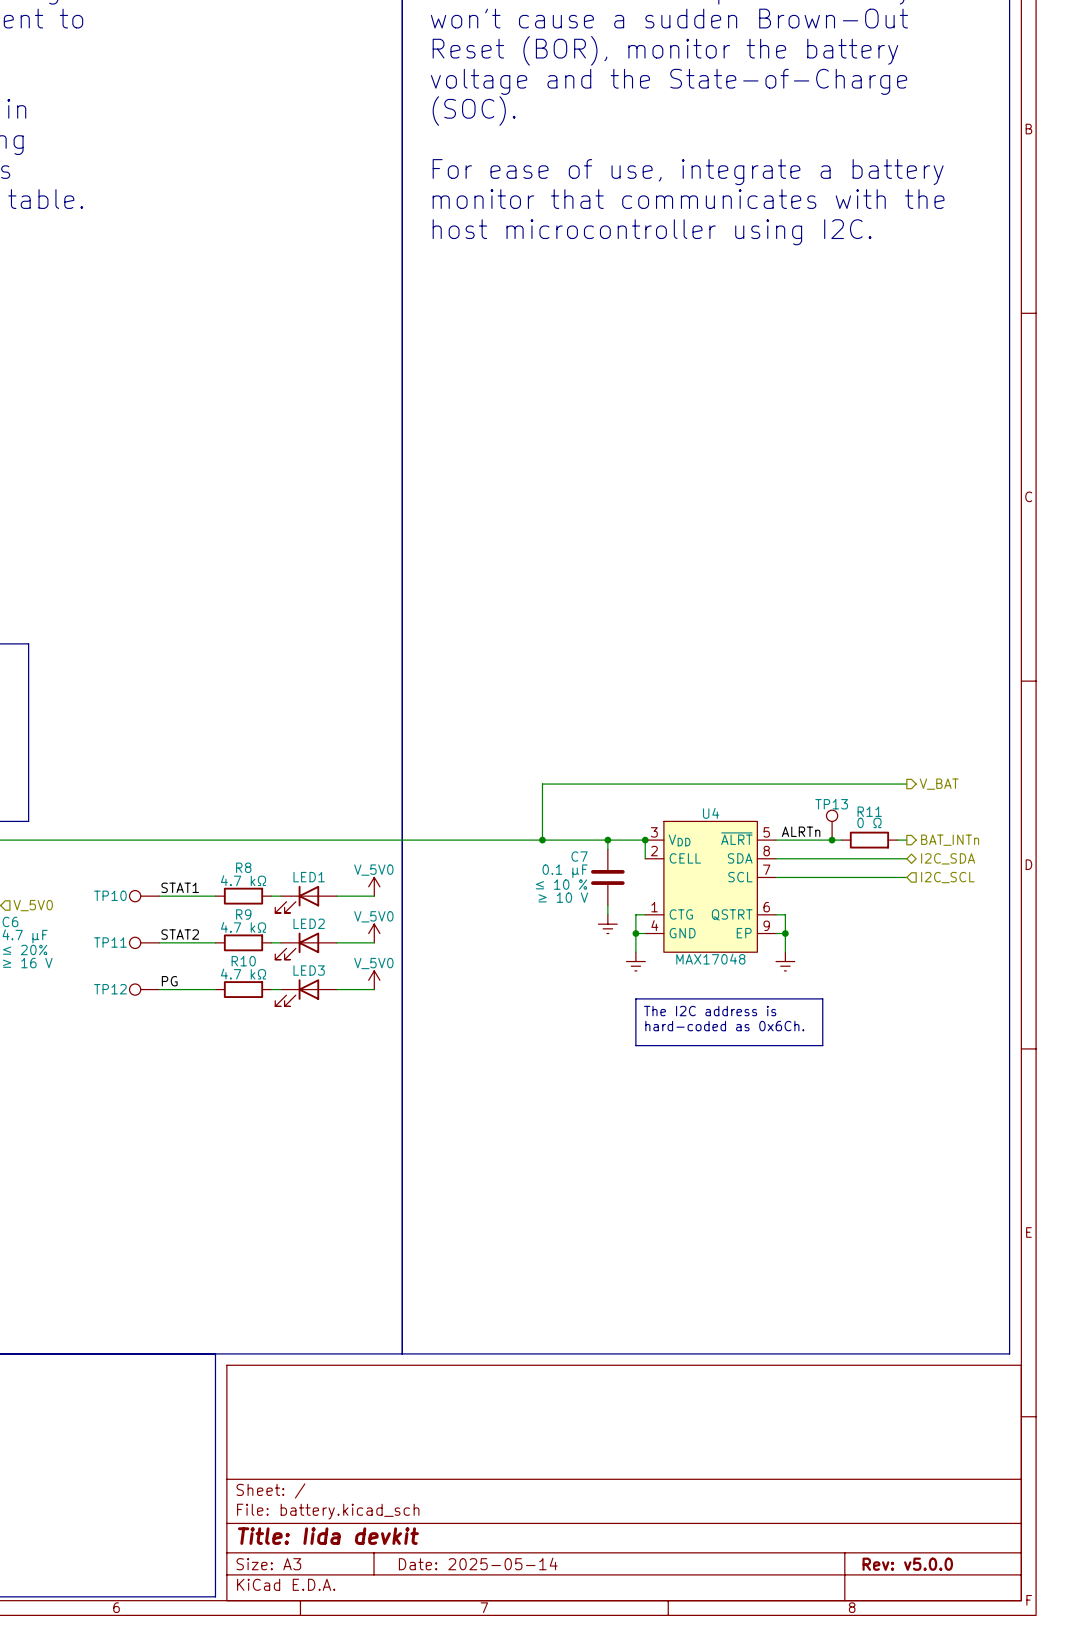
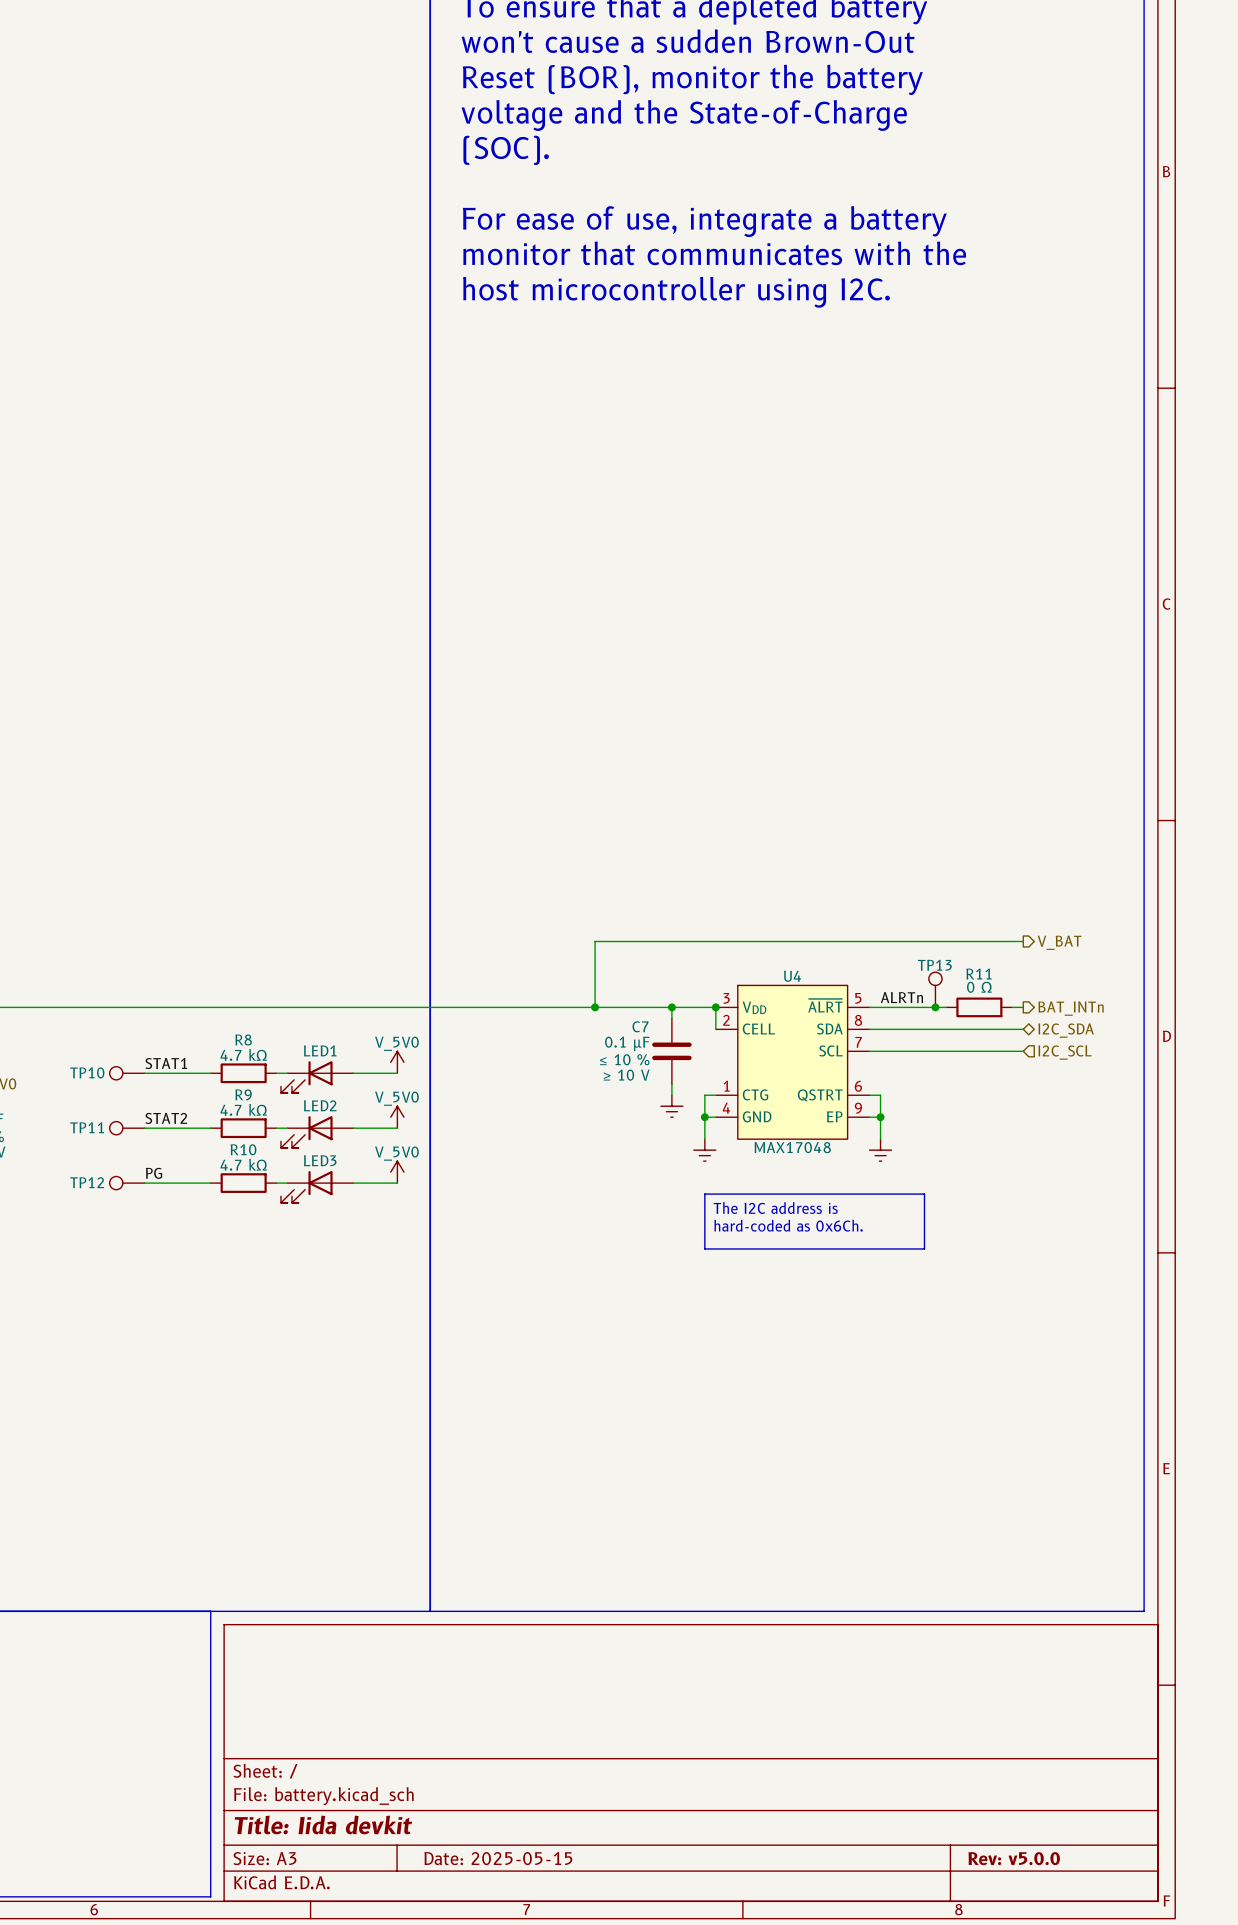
title block: Date: 2025-05-14 (478, 1563) -> Date: 2025-05-15 (498, 1858)

